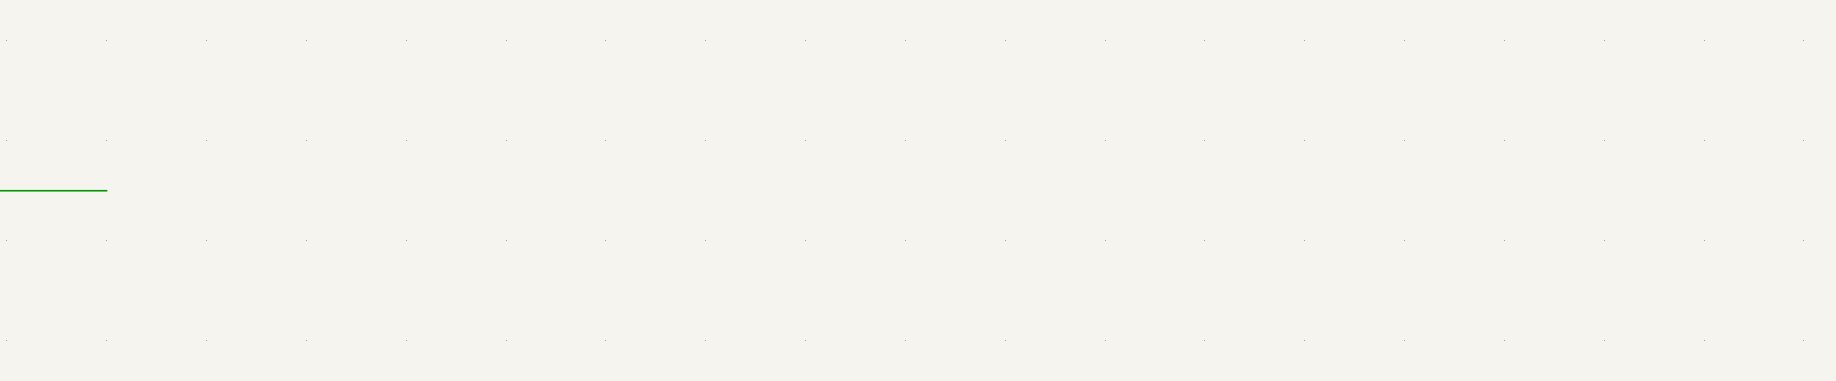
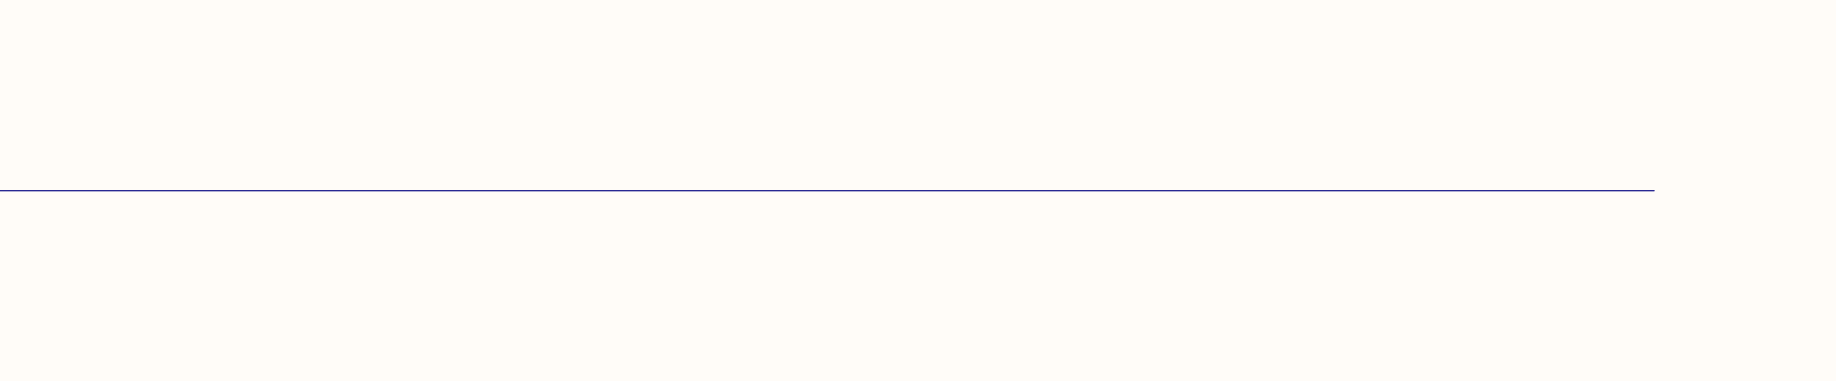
wire: none -> (106, 190) (1654, 190)

